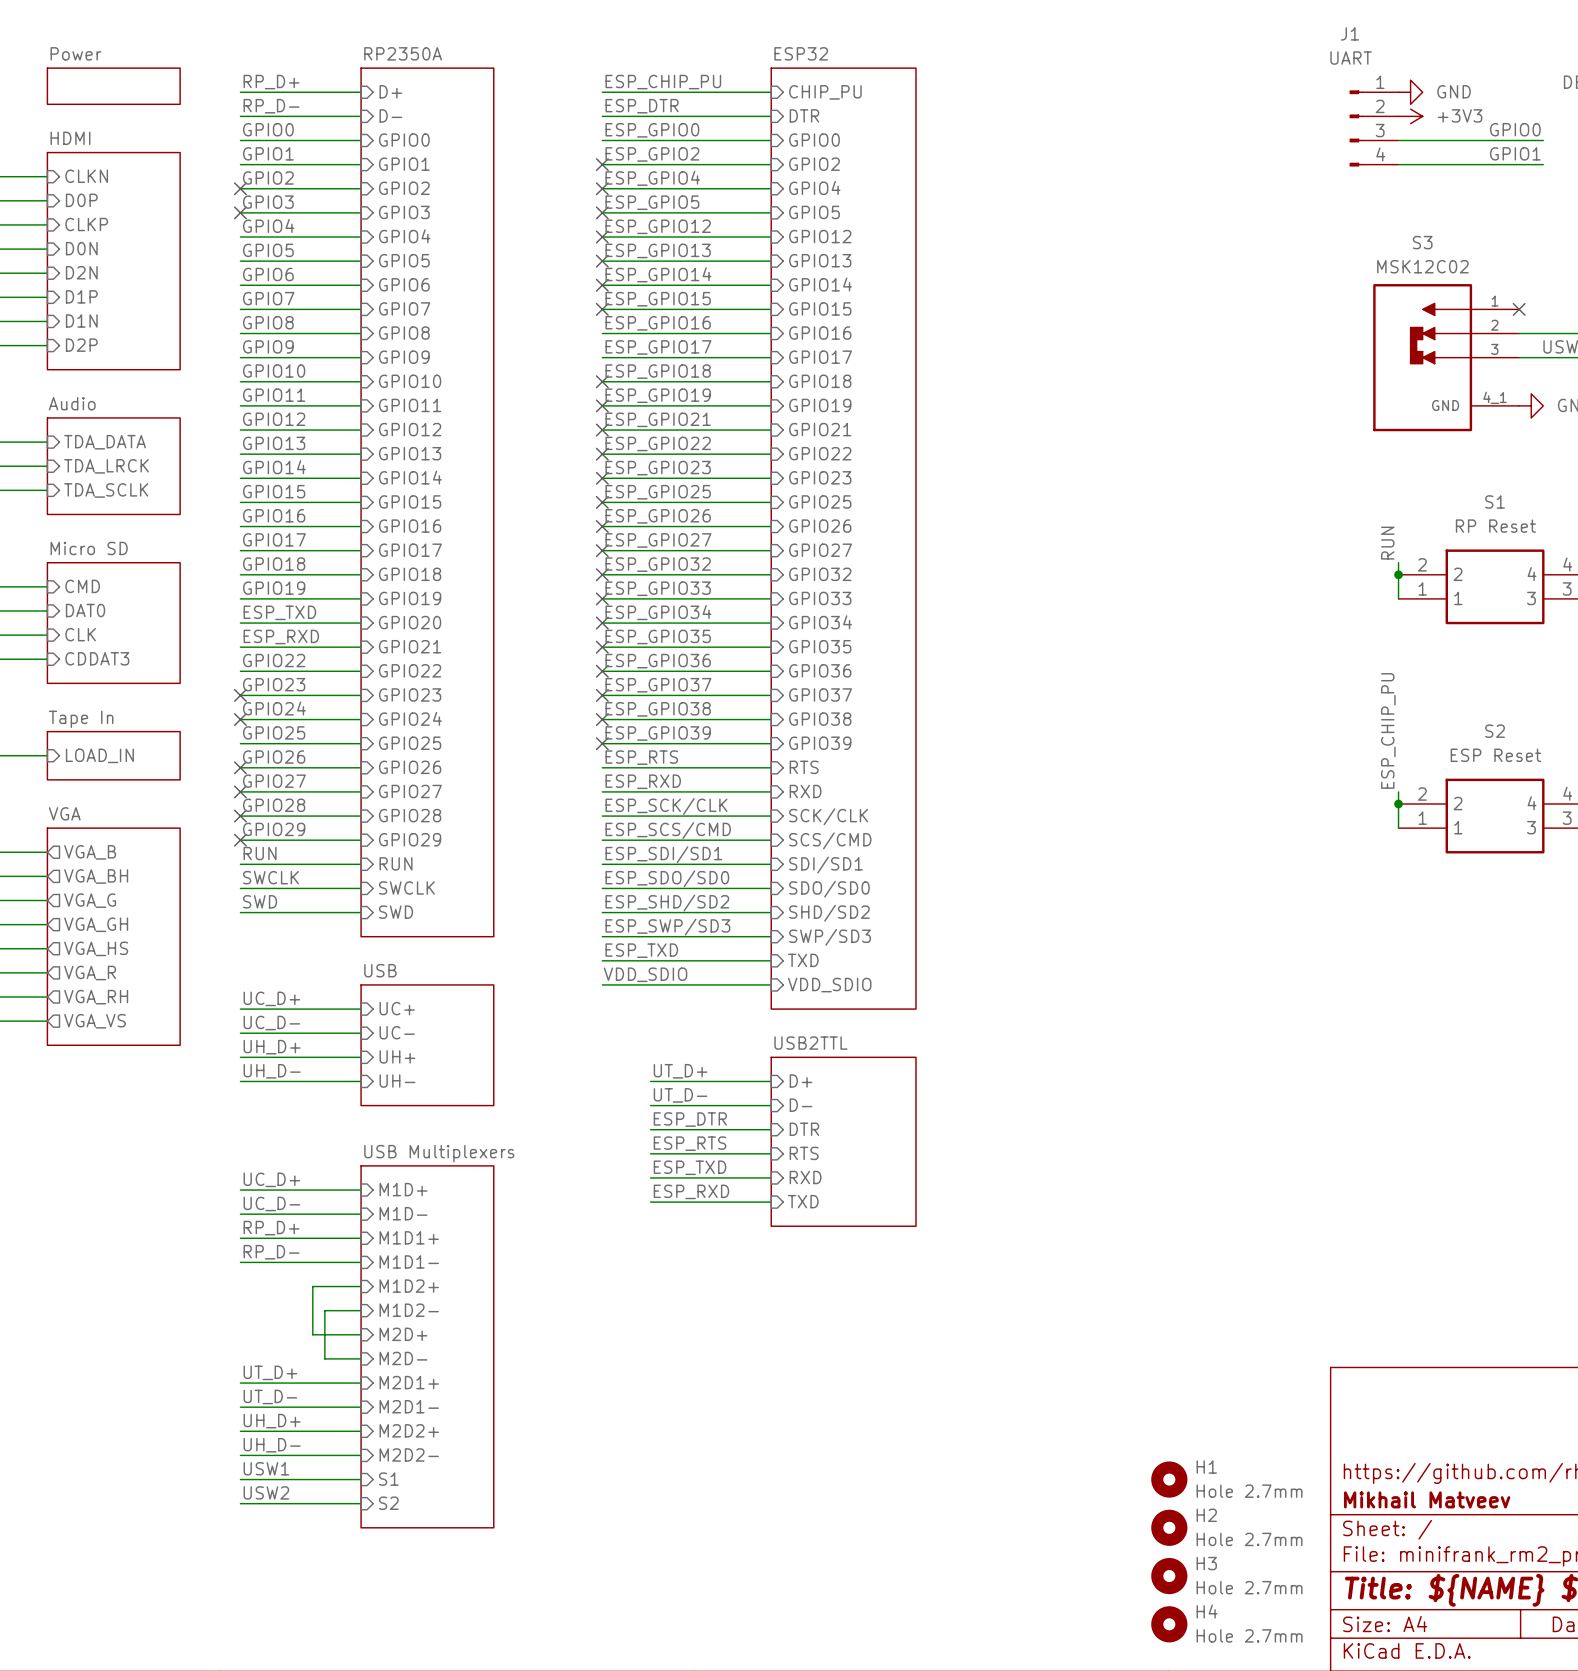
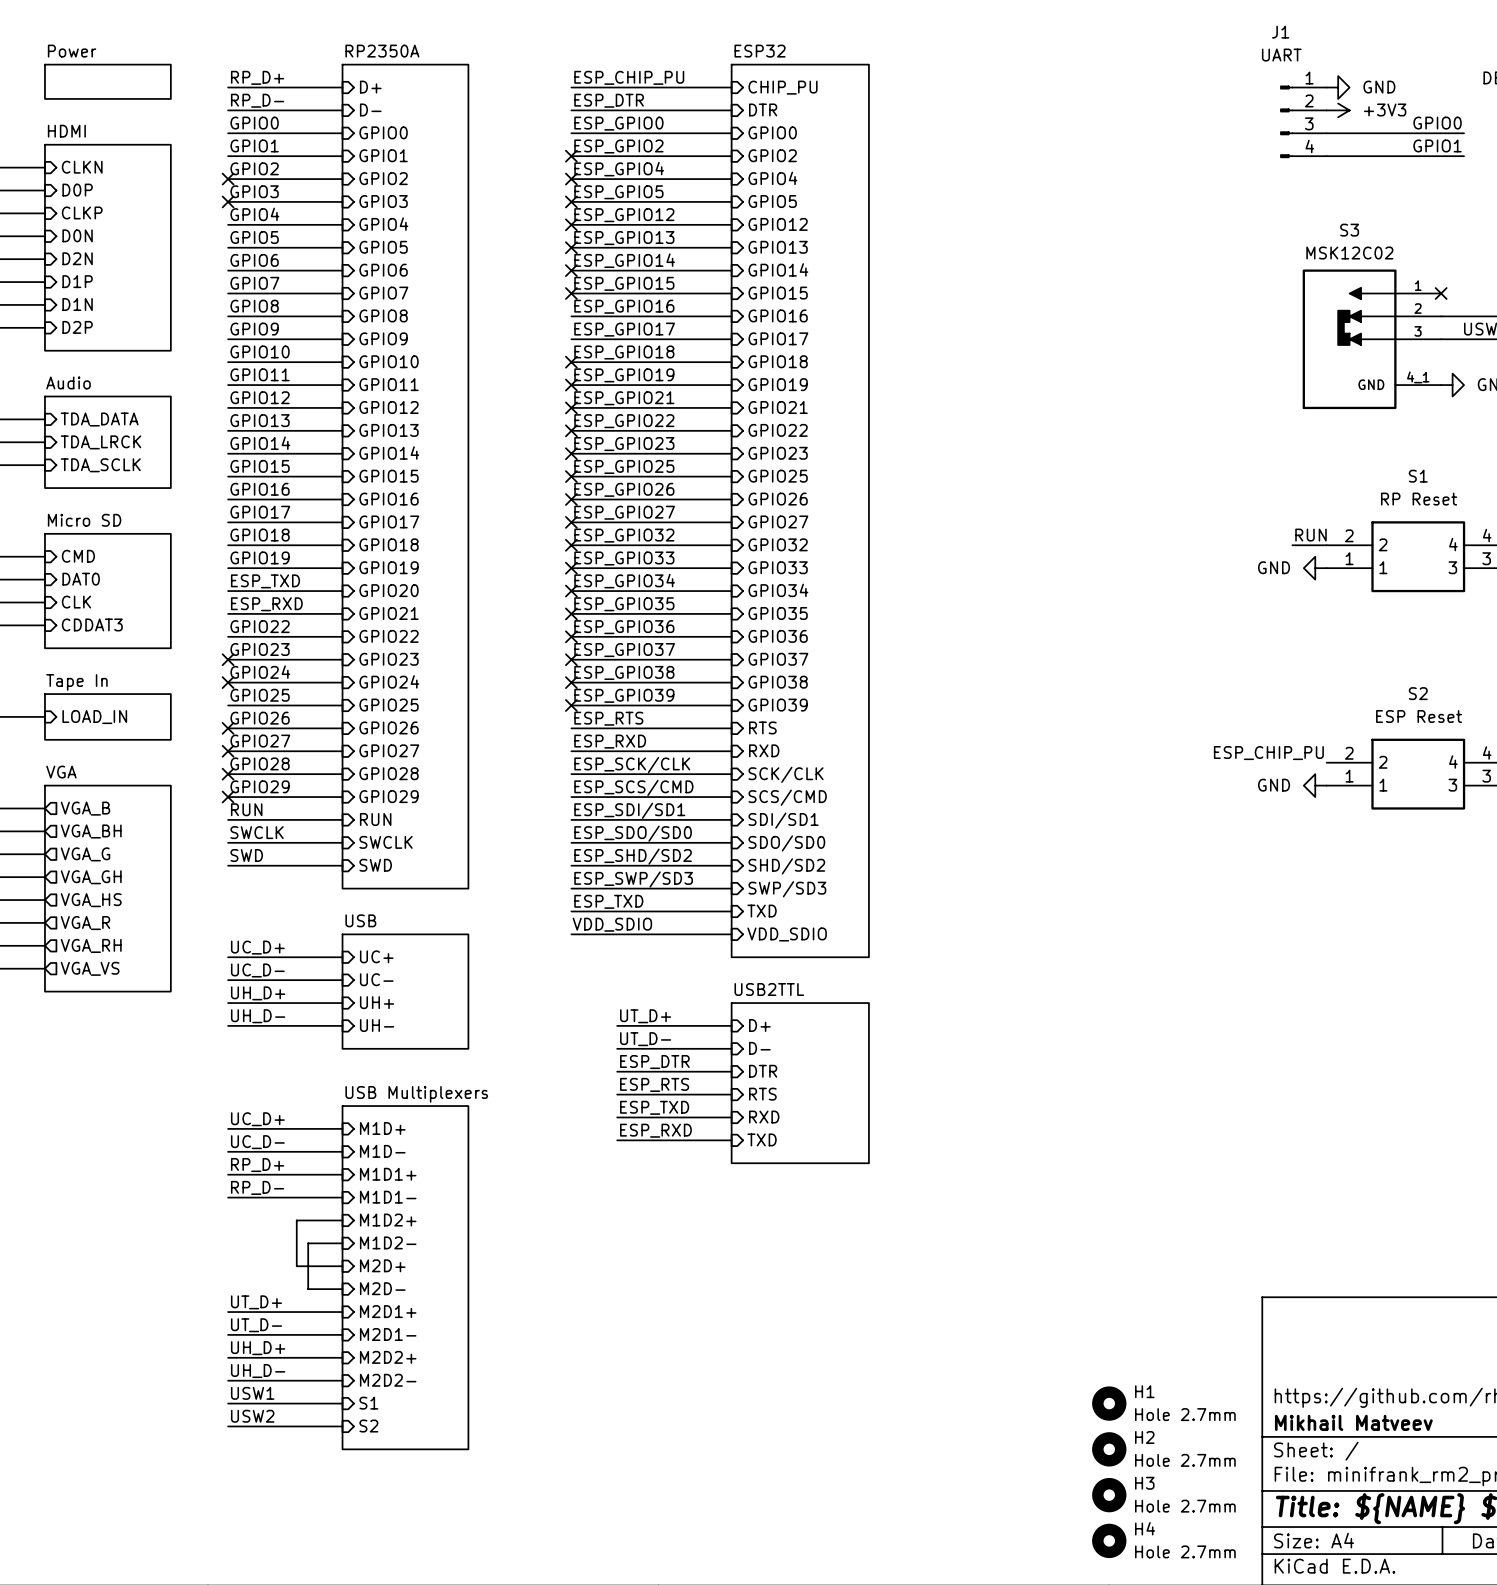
label rotation: 0° (1387, 543) -> 90° clockwise (1310, 535)
wire: (1398, 562) (1398, 598) -> none
wire: none -> (1292, 545) (1326, 545)
junction: (1398, 574) -> none
power symbol: none -> GND (1315, 568)
label rotation: 0° (1388, 730) -> 90° clockwise (1268, 753)
wire: (1398, 791) (1398, 828) -> none
junction: (1398, 804) -> none
power symbol: none -> GND (1315, 785)

